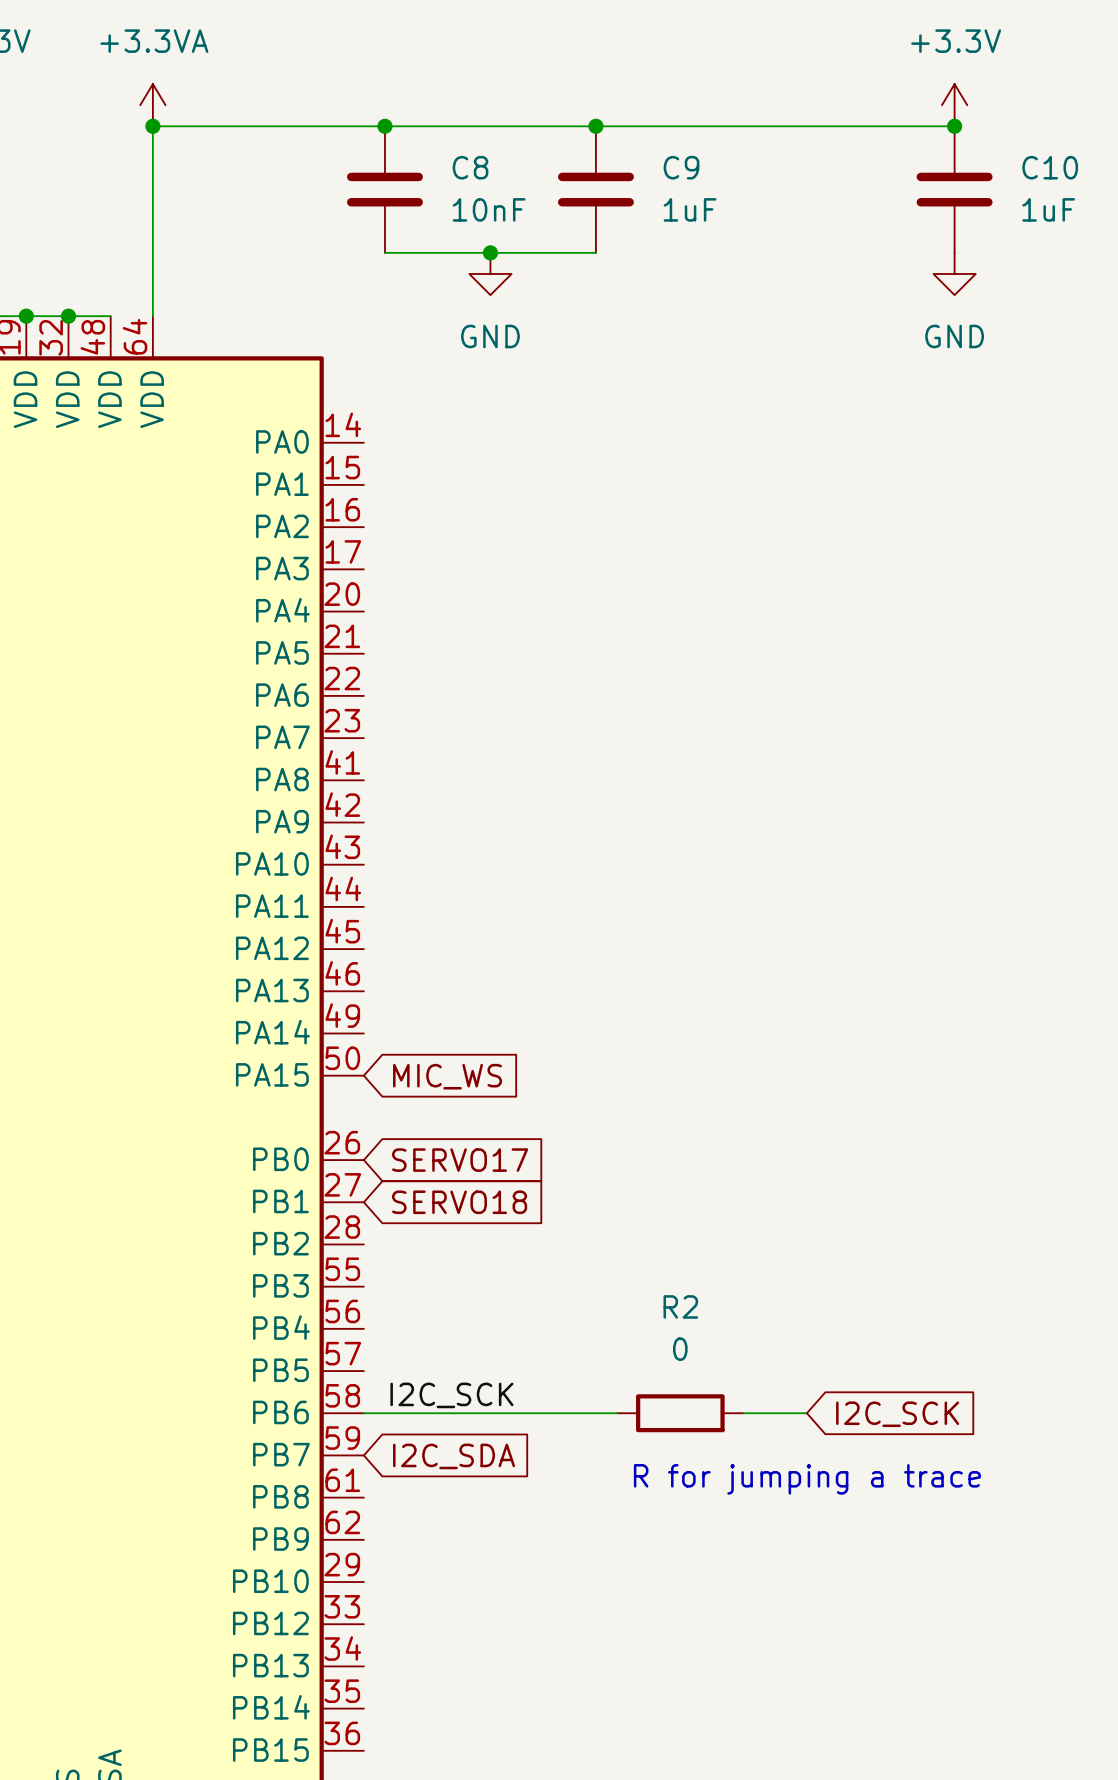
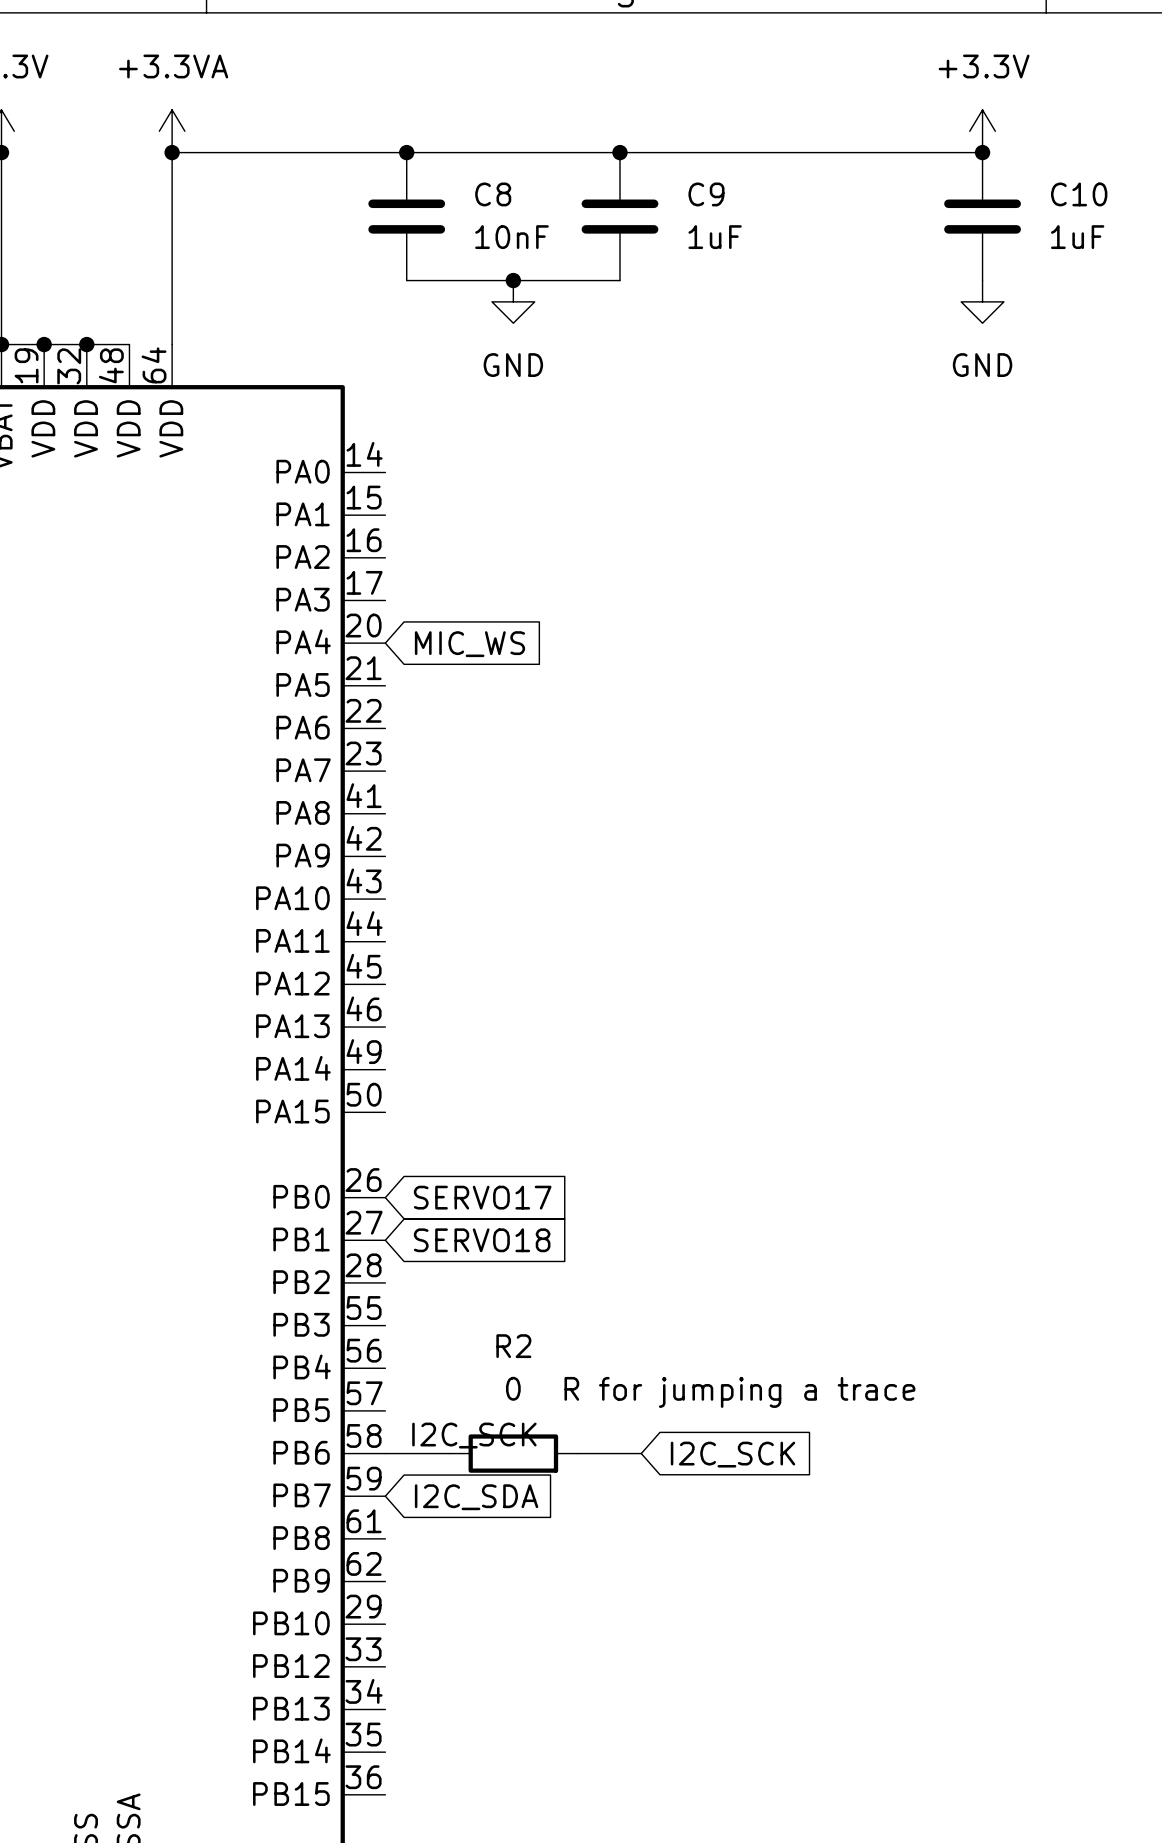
global label: none -> MIC_WS (469, 644)
global label: MIC_WS (447, 1076) -> none
wire: (427, 1413) (553, 1413) -> none
R2 position: (680, 1413) -> (513, 1453)
wire: (743, 1413) (806, 1413) -> none
global label position: I2C_SCK (897, 1414) -> I2C_SCK (733, 1454)
text position: R for jumping a trace (807, 1479) -> R for jumping a trace (739, 1392)

